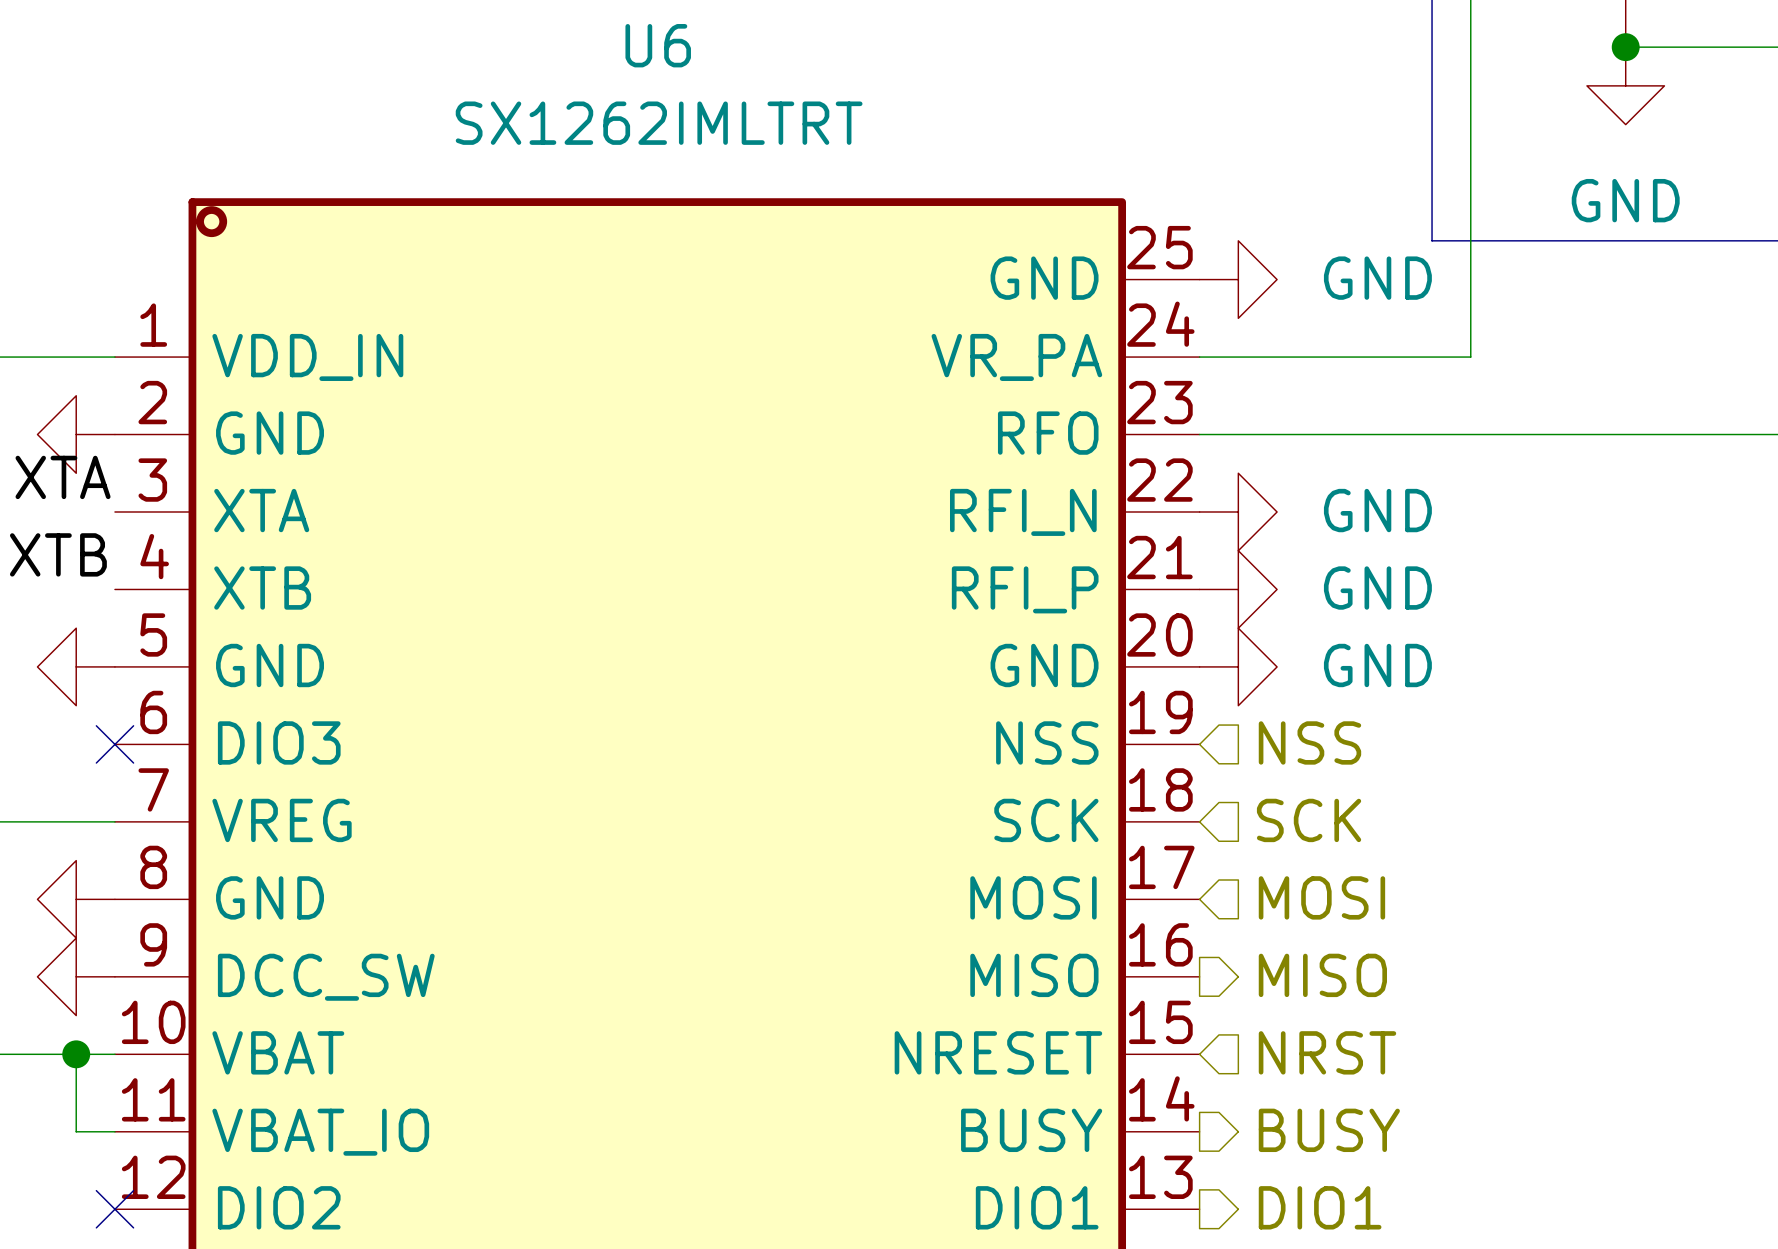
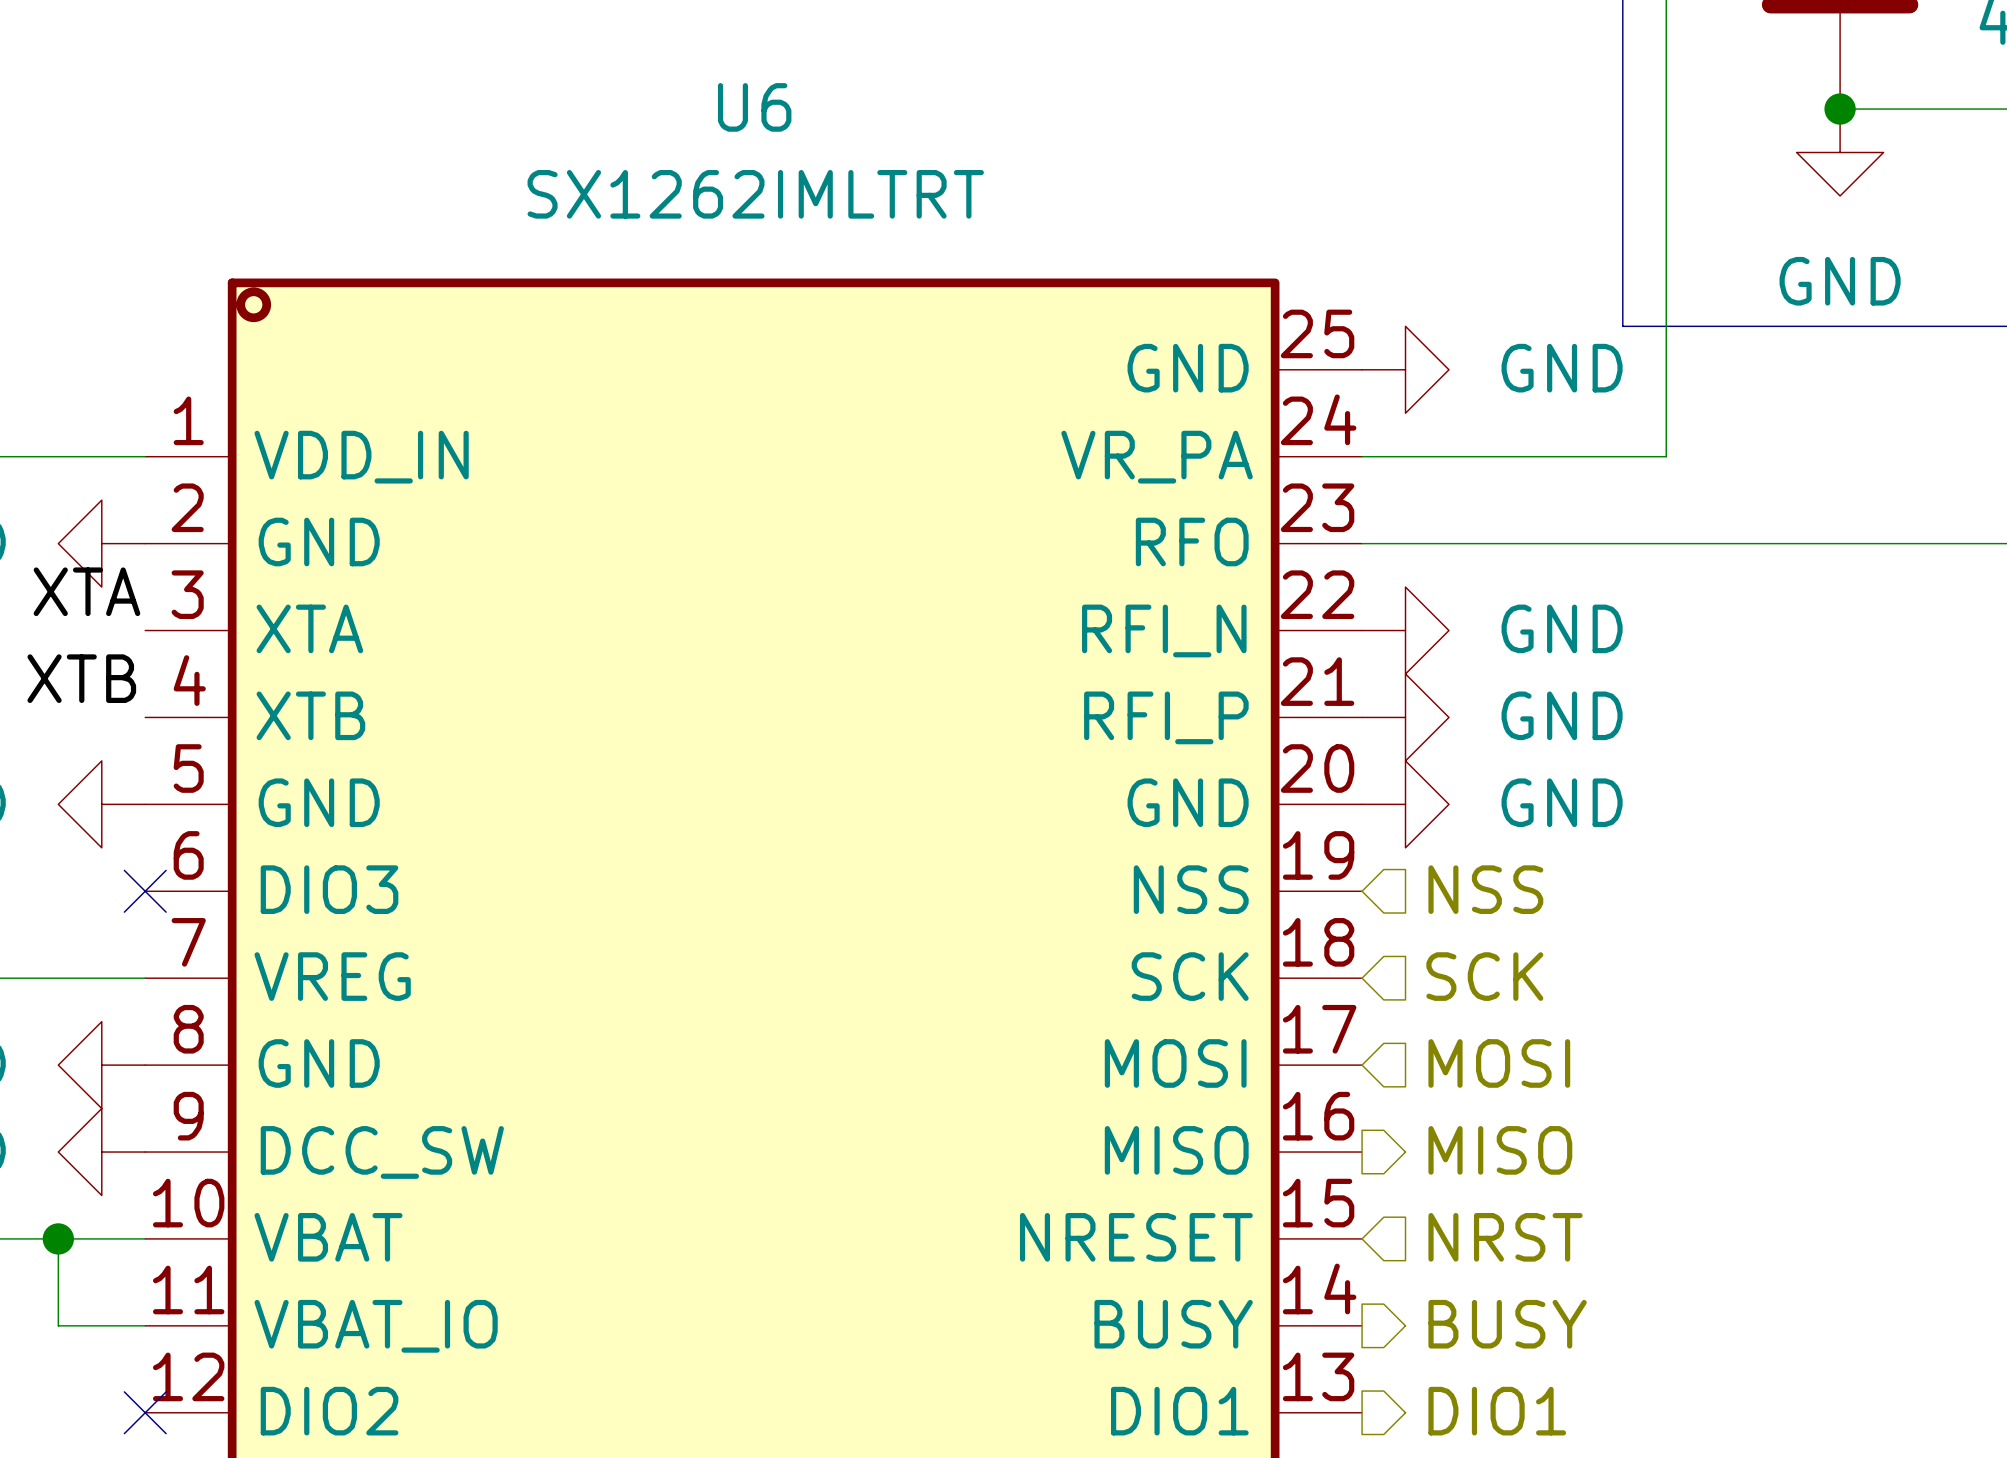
wire: (76, 1054) (76, 1131) -> (58, 1238) (58, 1325) (101, 1325)
junction position: (76, 1054) -> (58, 1238)

